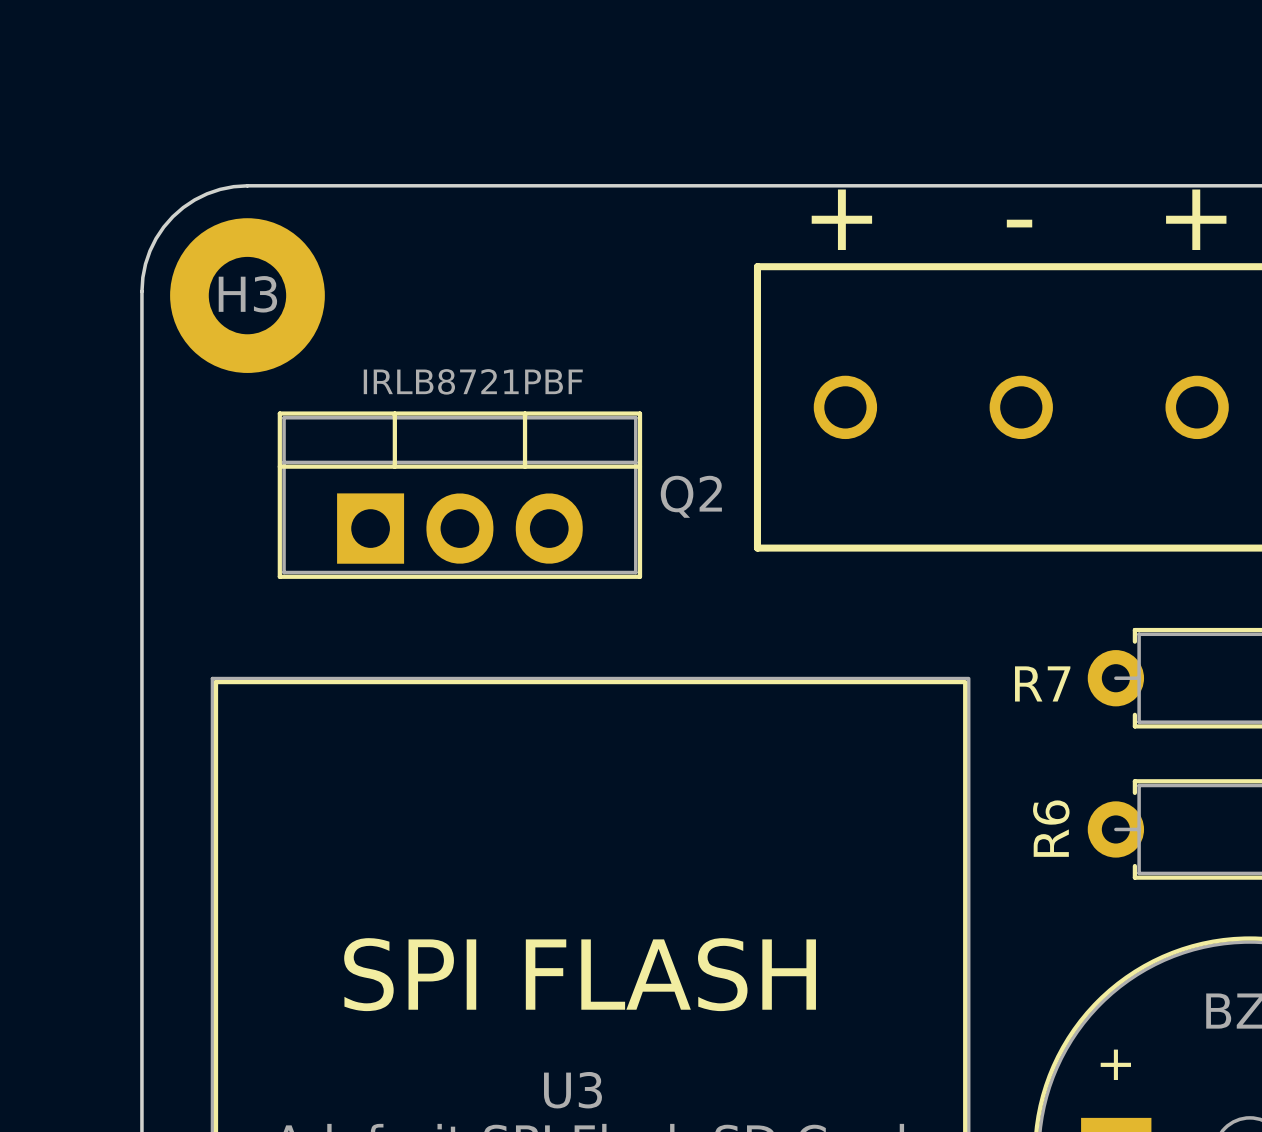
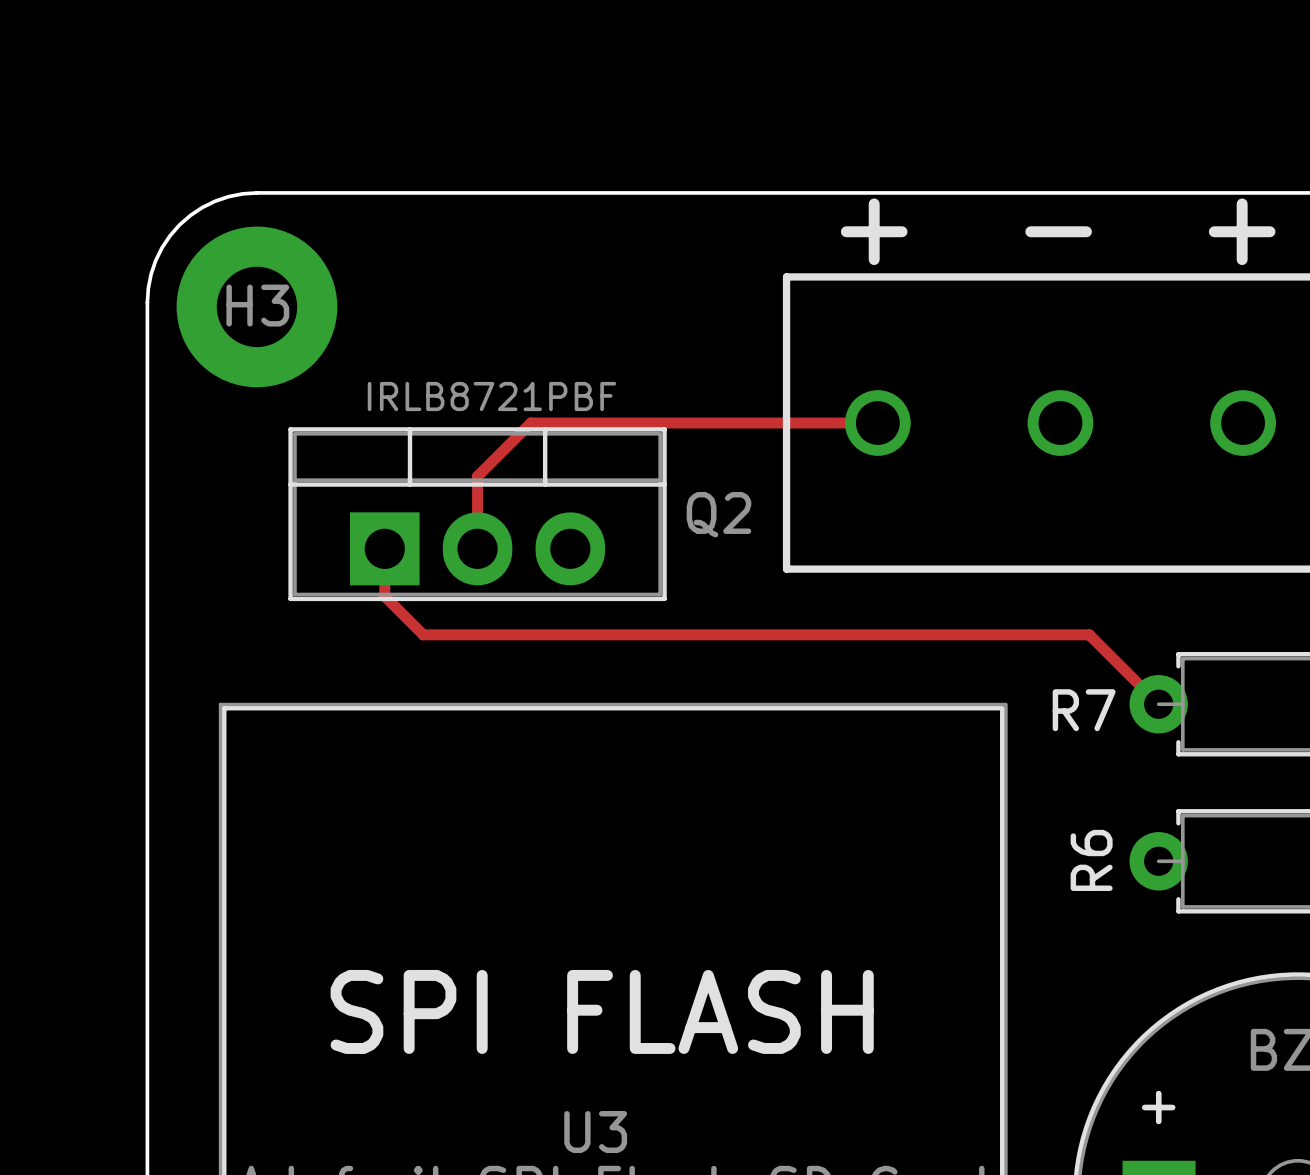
top track: none -> (877, 423) (530, 423) (477, 476) (477, 548)
top track: none -> (384, 548) (384, 596) (423, 634) (1089, 634) (1158, 704)

